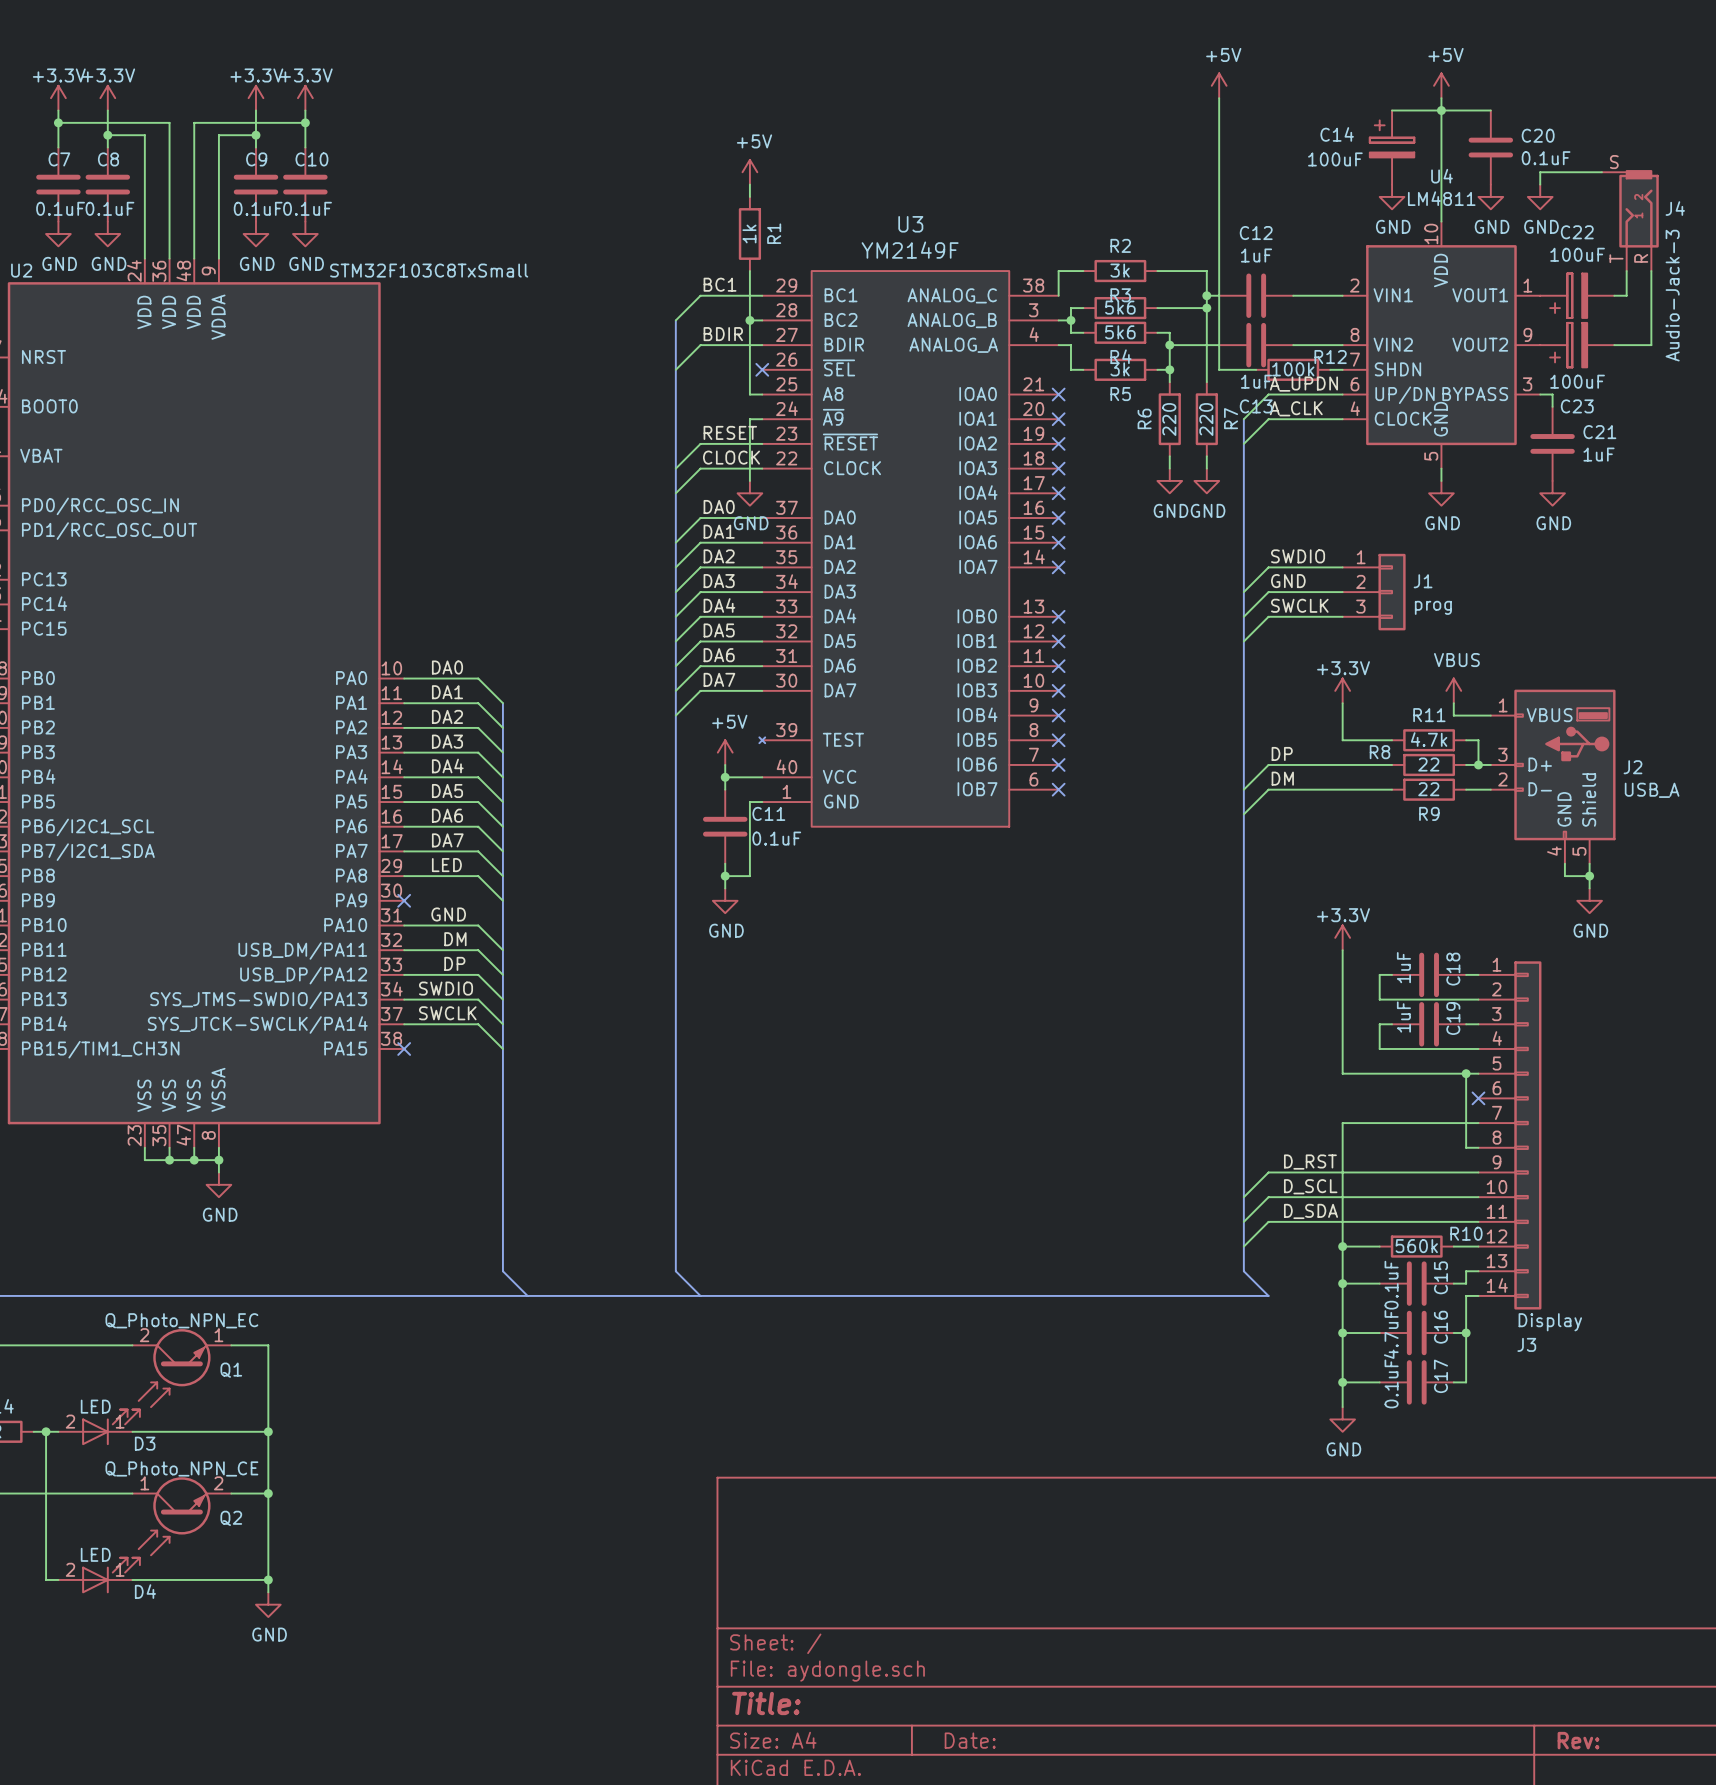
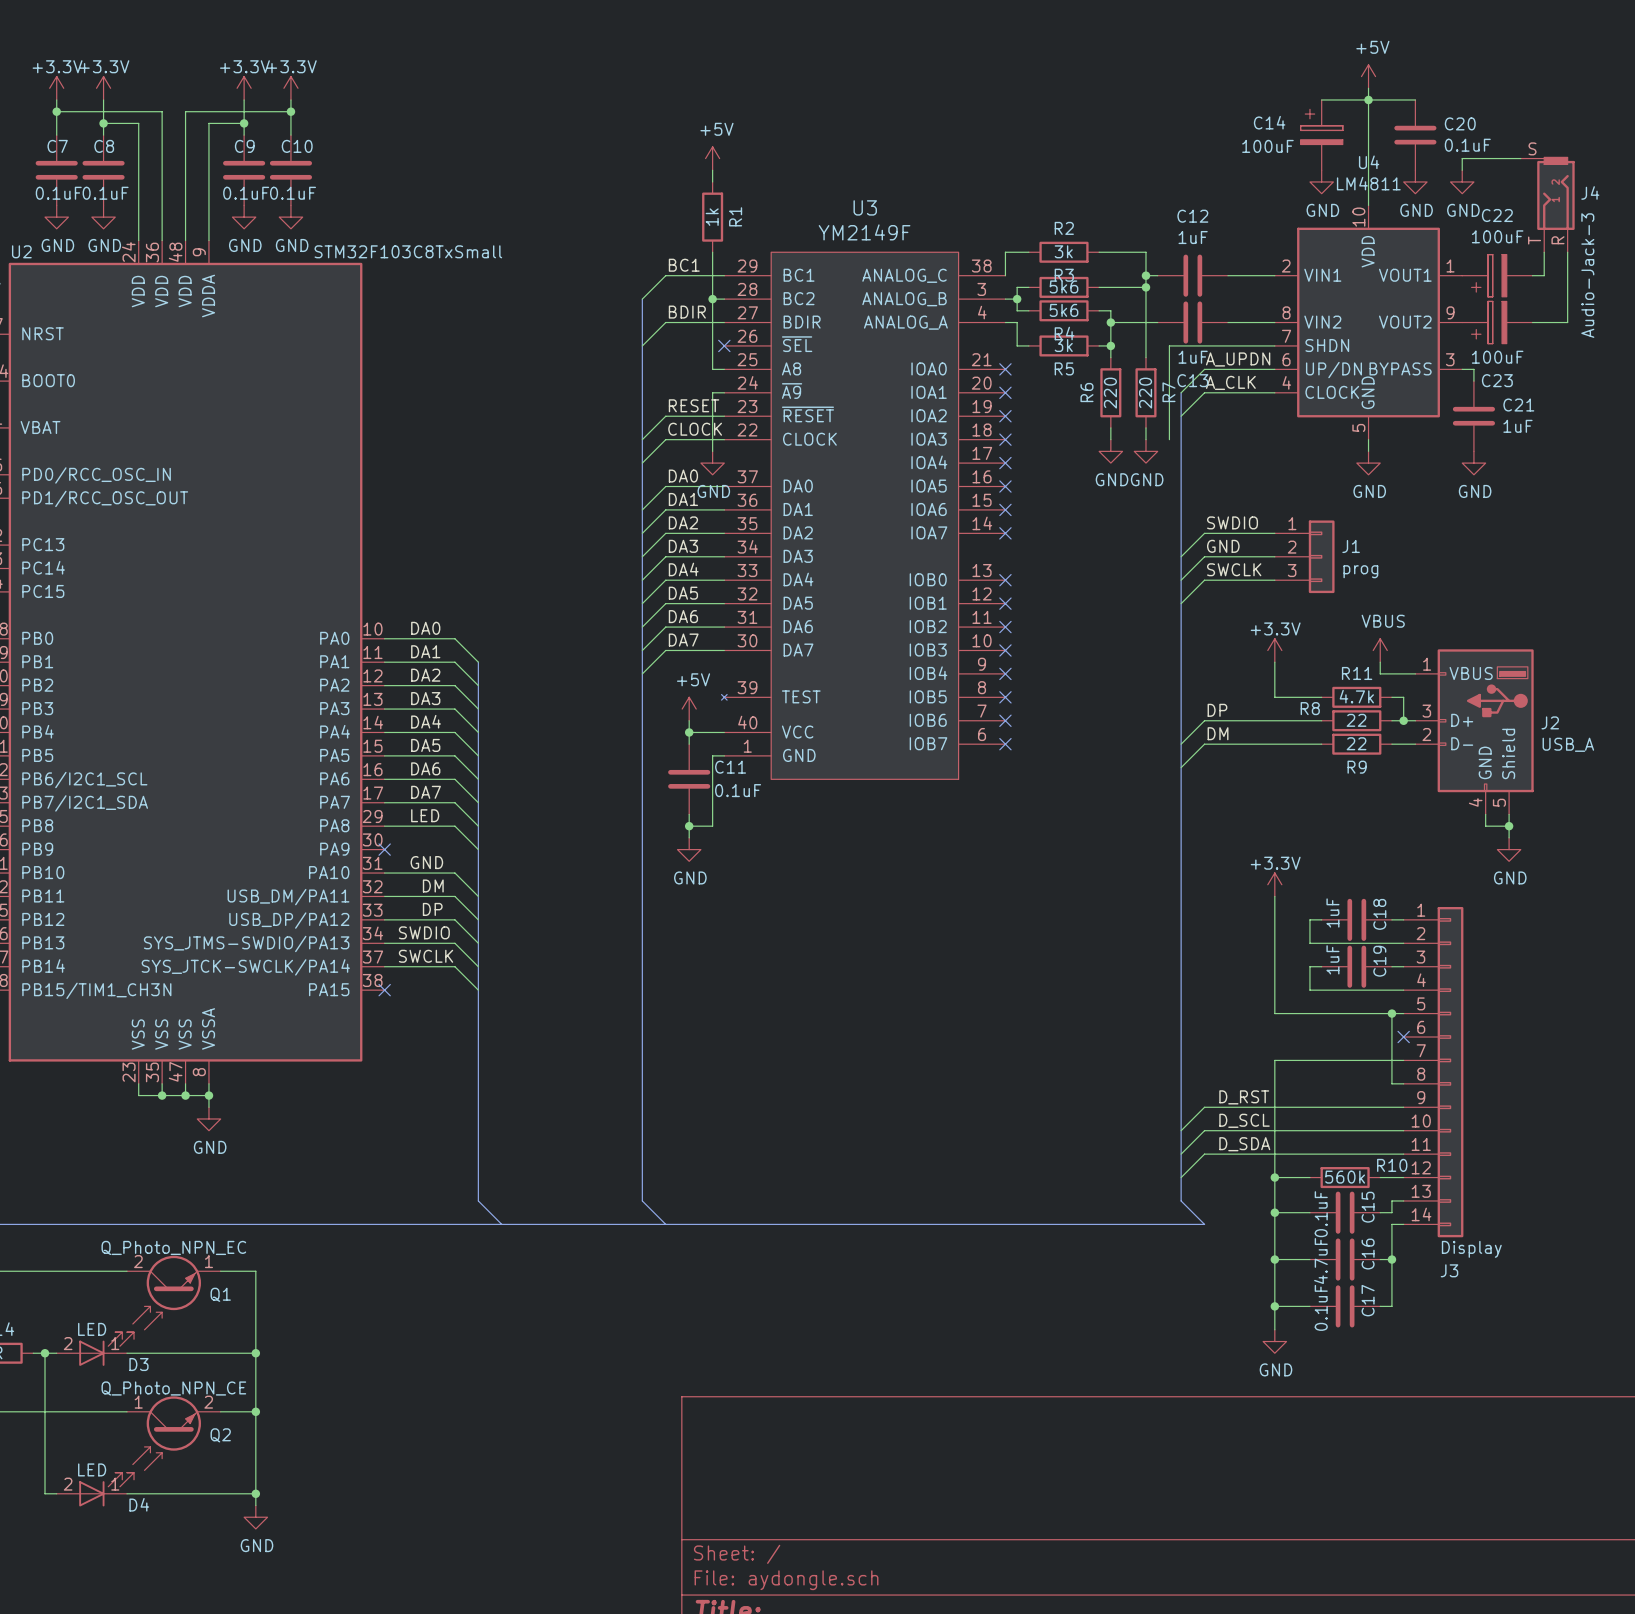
power symbol: +5V (1219, 85) -> none
wire: (1219, 98) (1219, 369) (1231, 369) -> (1169, 439) (1169, 345)
R12: 100k (1293, 369) -> none

